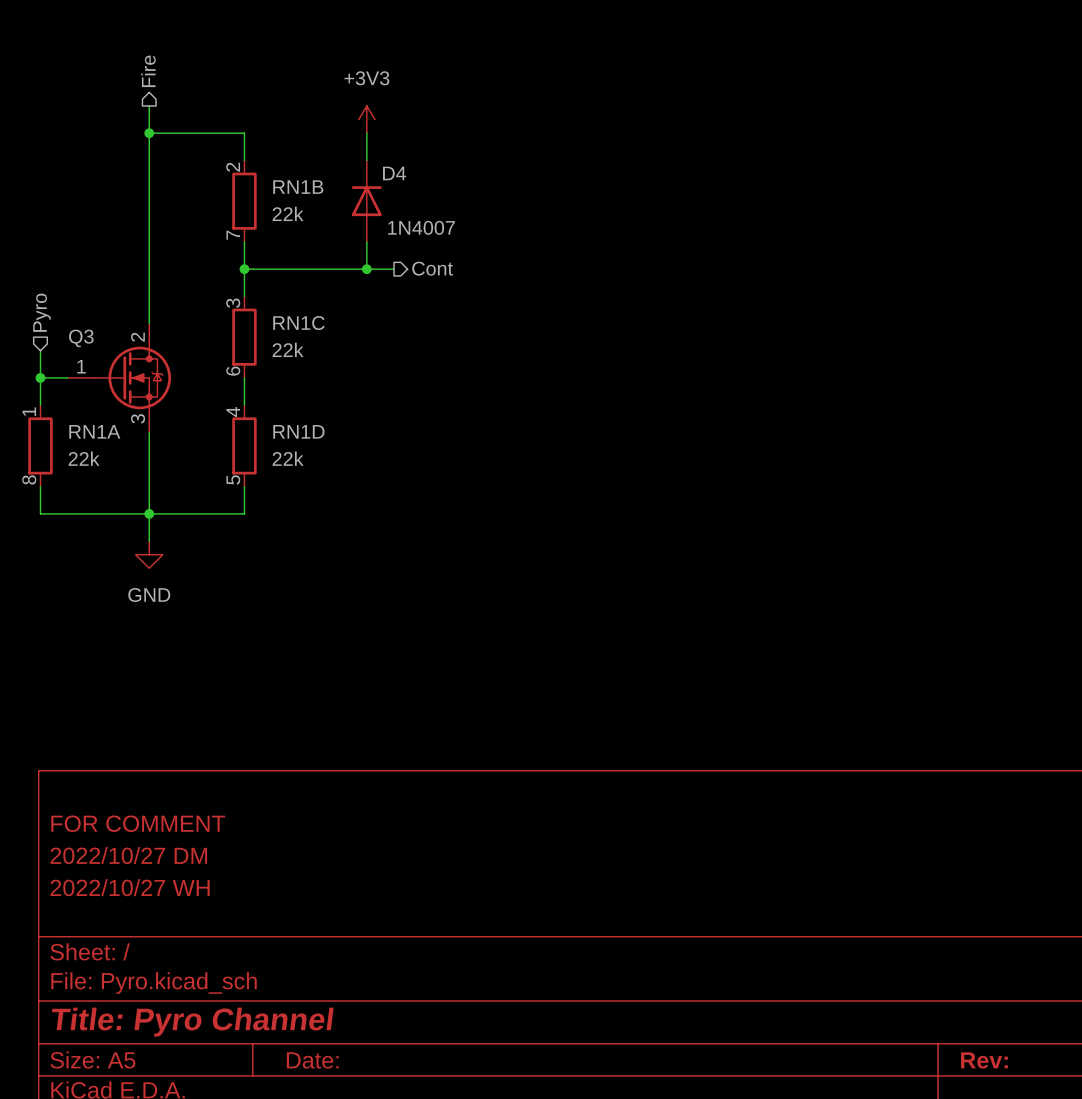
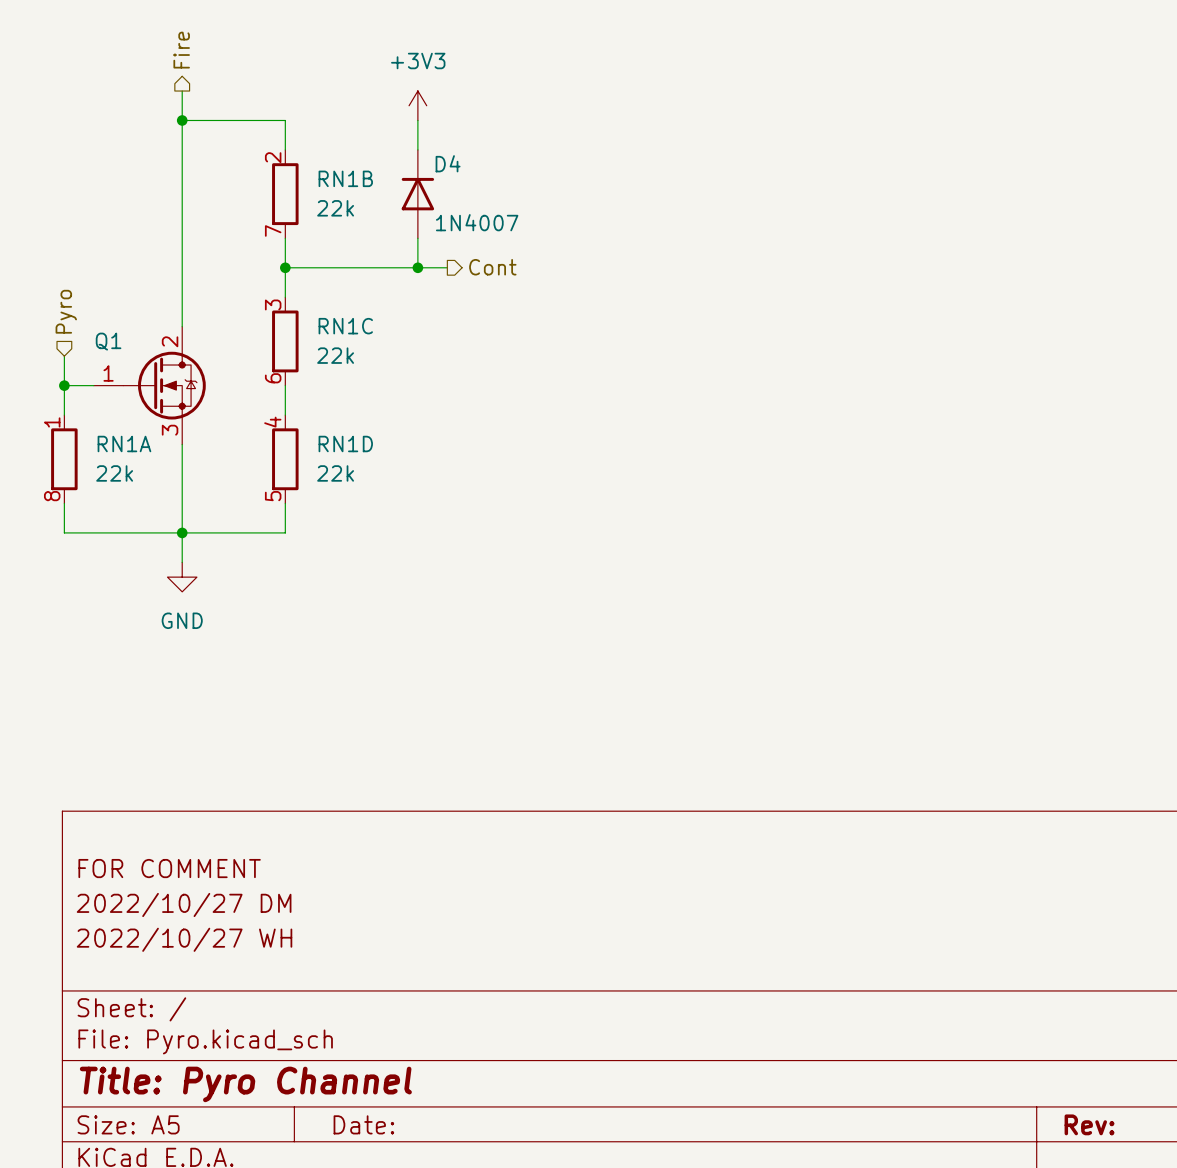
Q3 name: Q3 (81, 338) -> Q1 (108, 341)

